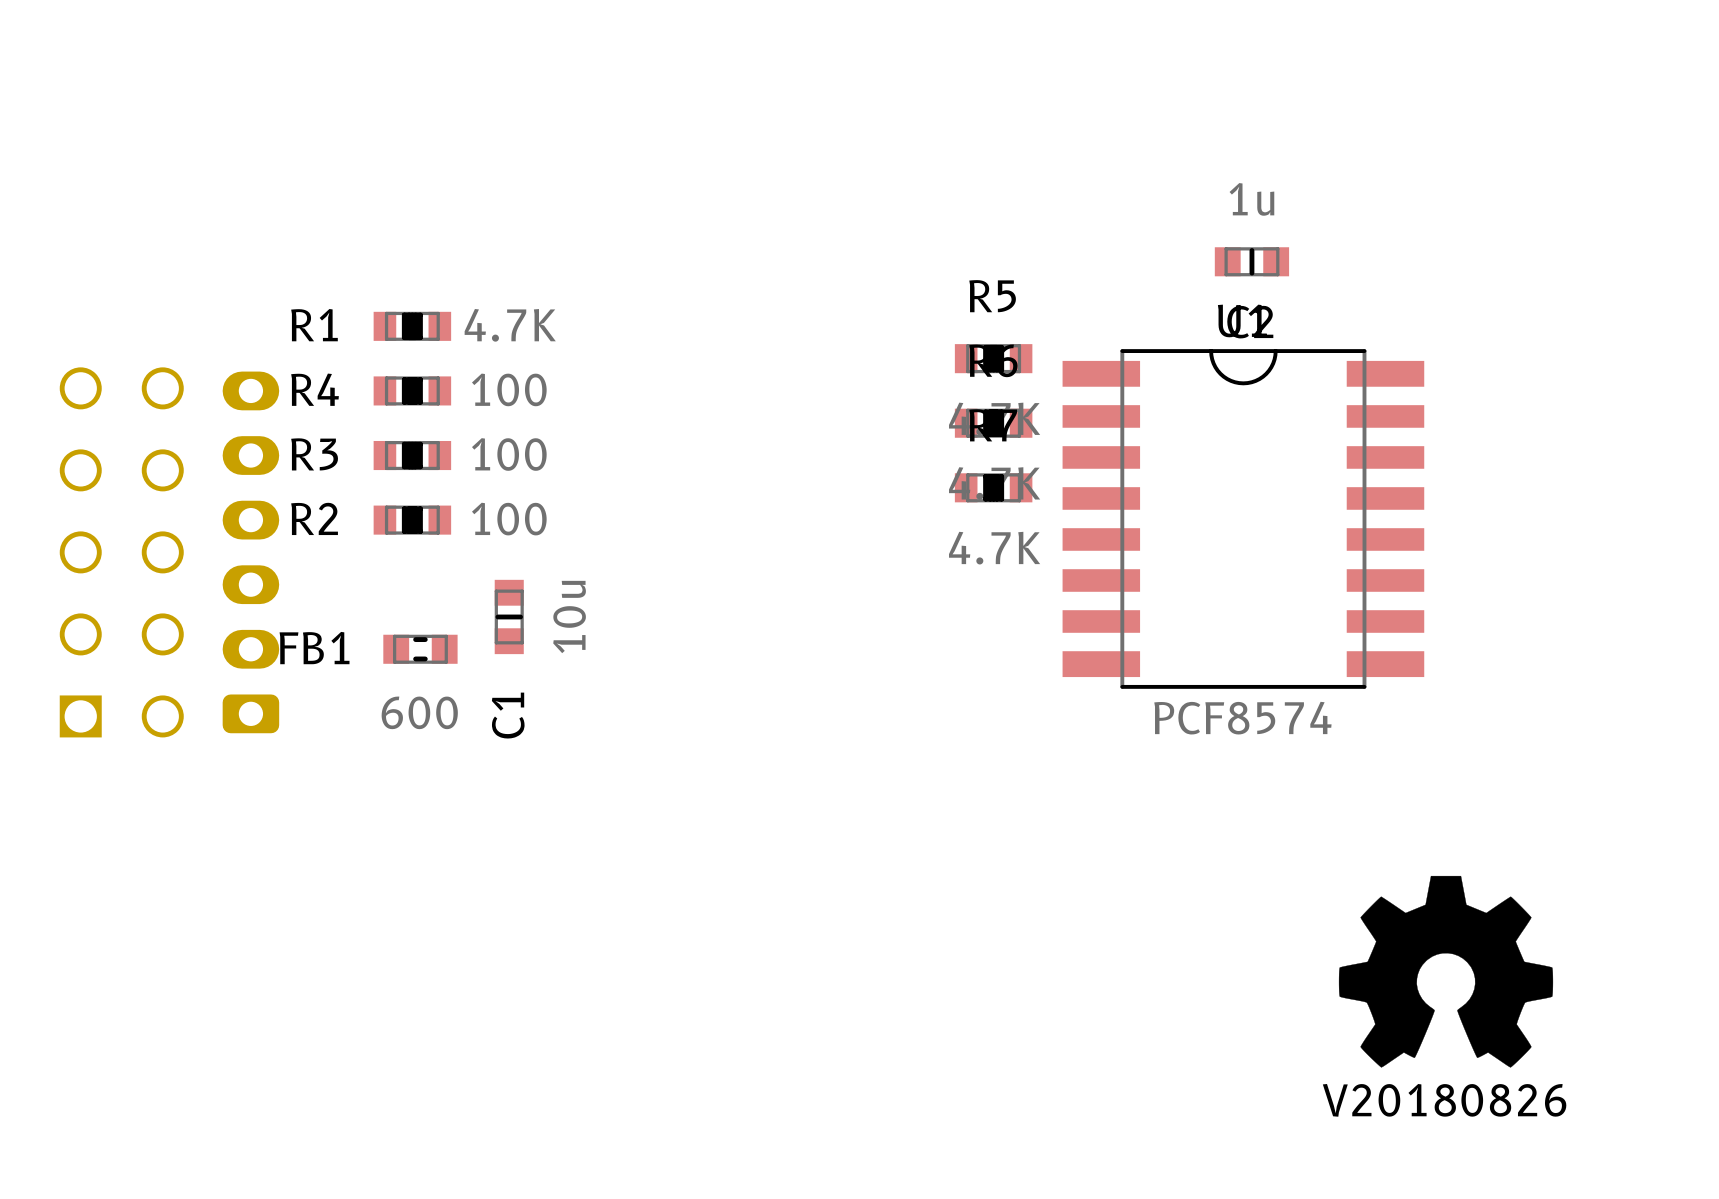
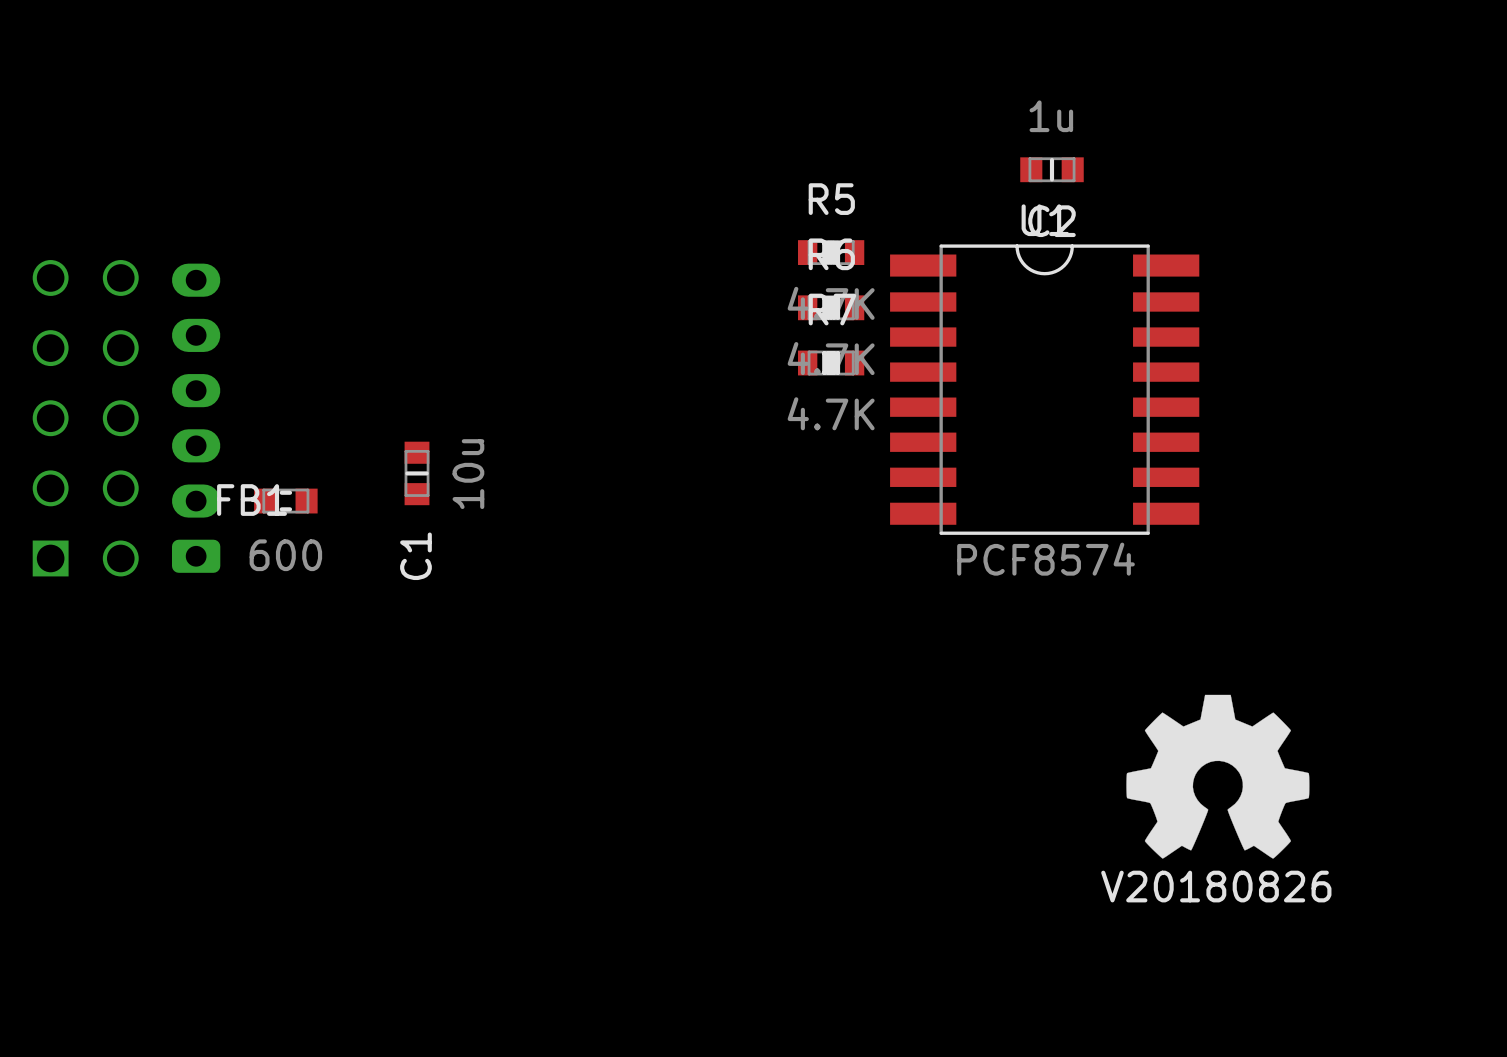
R1: 4.7K (412, 326) -> none
R4: 100 (412, 390) -> none
R3: 100 (412, 455) -> none
R2: 100 (412, 520) -> none
FB1 position: (420, 649) -> (285, 501)

